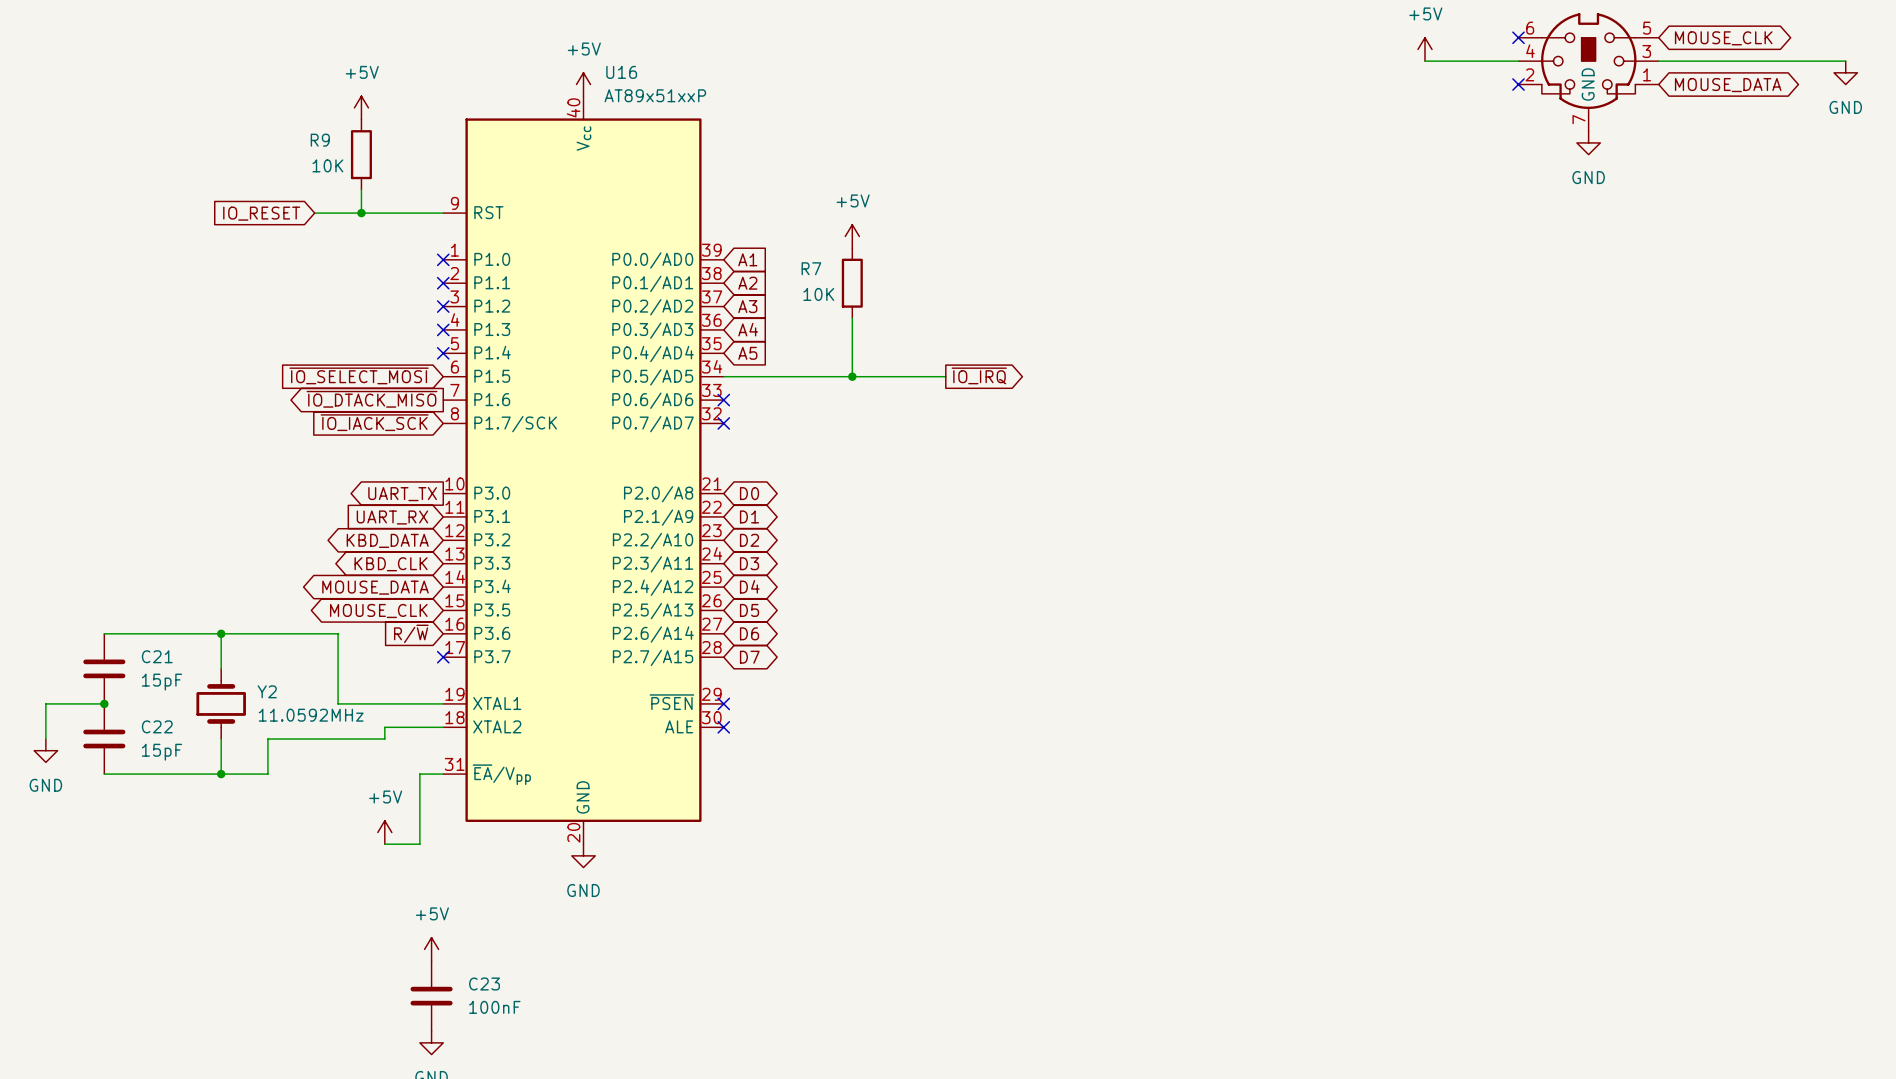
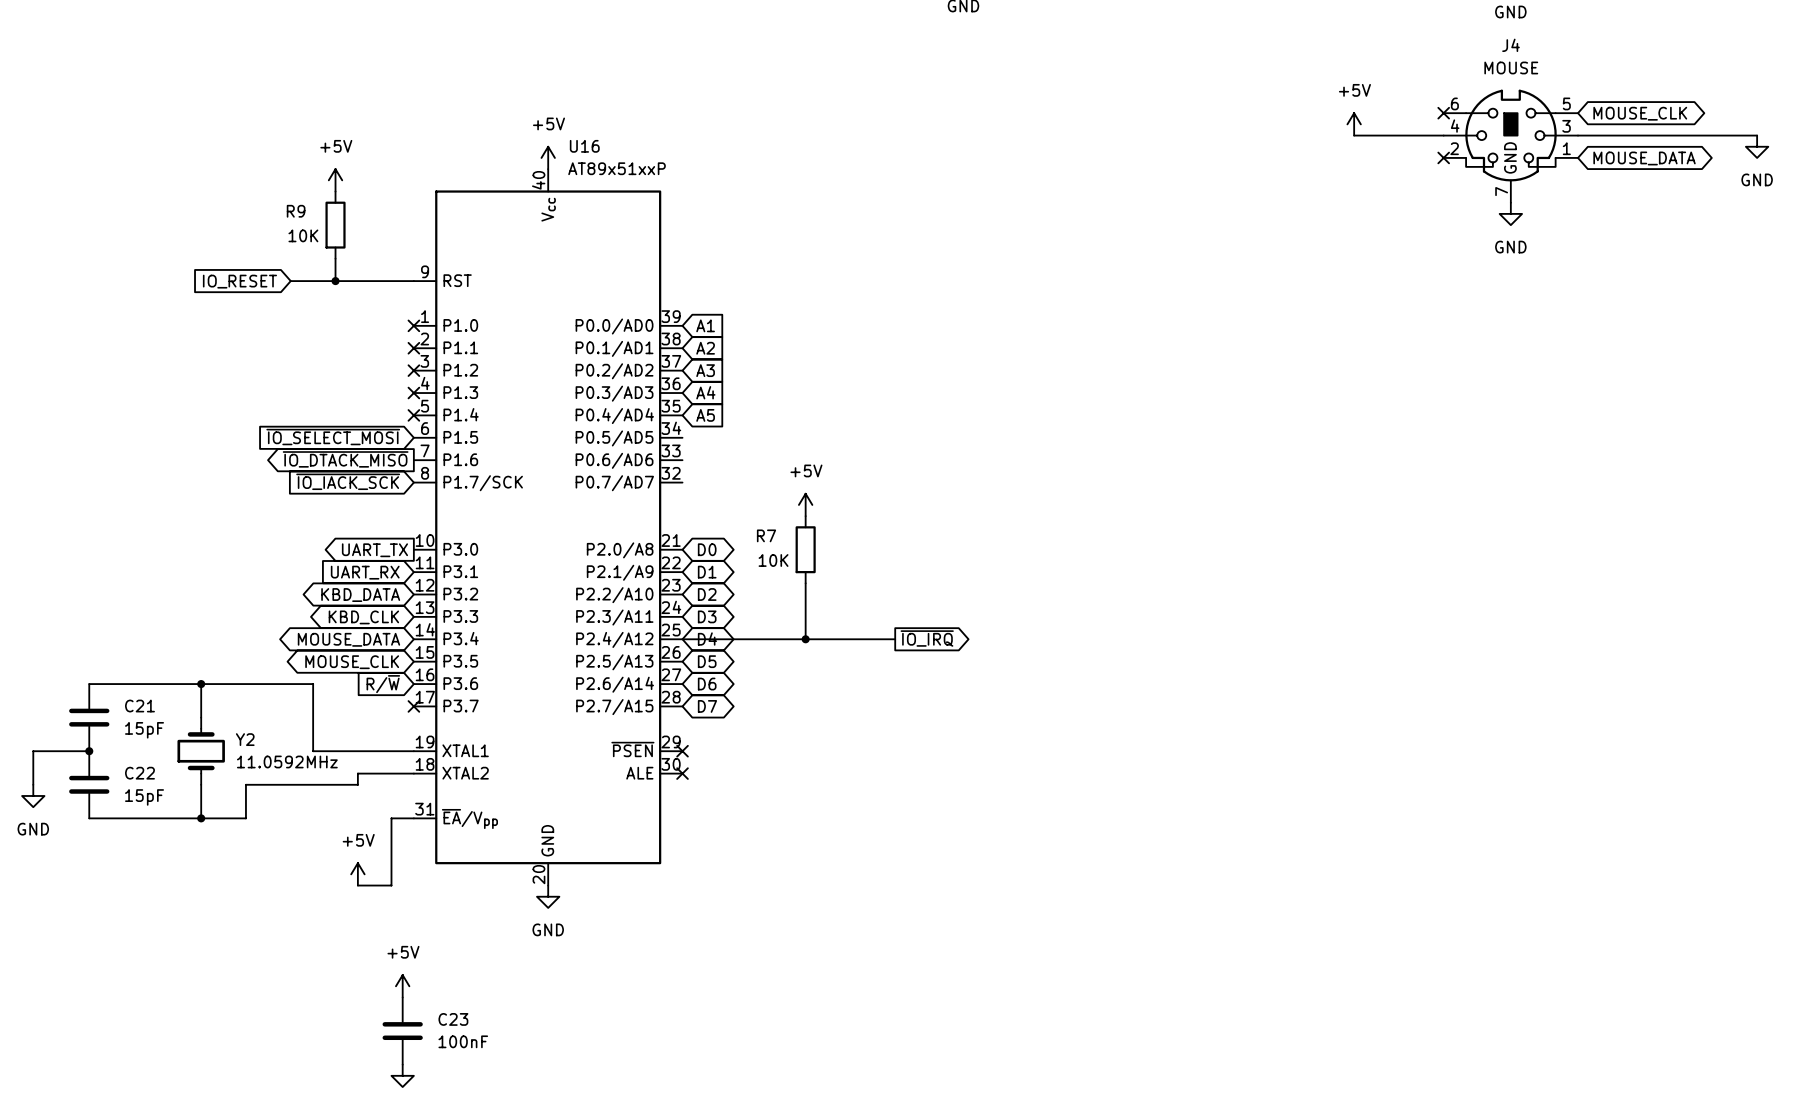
power symbol position: +5V (852, 236) -> +5V (805, 504)
R7 position: (852, 283) -> (805, 549)
wire: (852, 318) (852, 376) -> (805, 583) (805, 639)
global label position: ~{IO_IRQ} (979, 375) -> ~{IO_IRQ} (927, 638)
wire: (723, 376) (945, 376) -> (682, 639) (895, 639)
junction: (852, 376) -> none
no-connect mark: (723, 400) -> none
no-connect mark: (723, 423) -> none
junction: none -> (805, 639)

